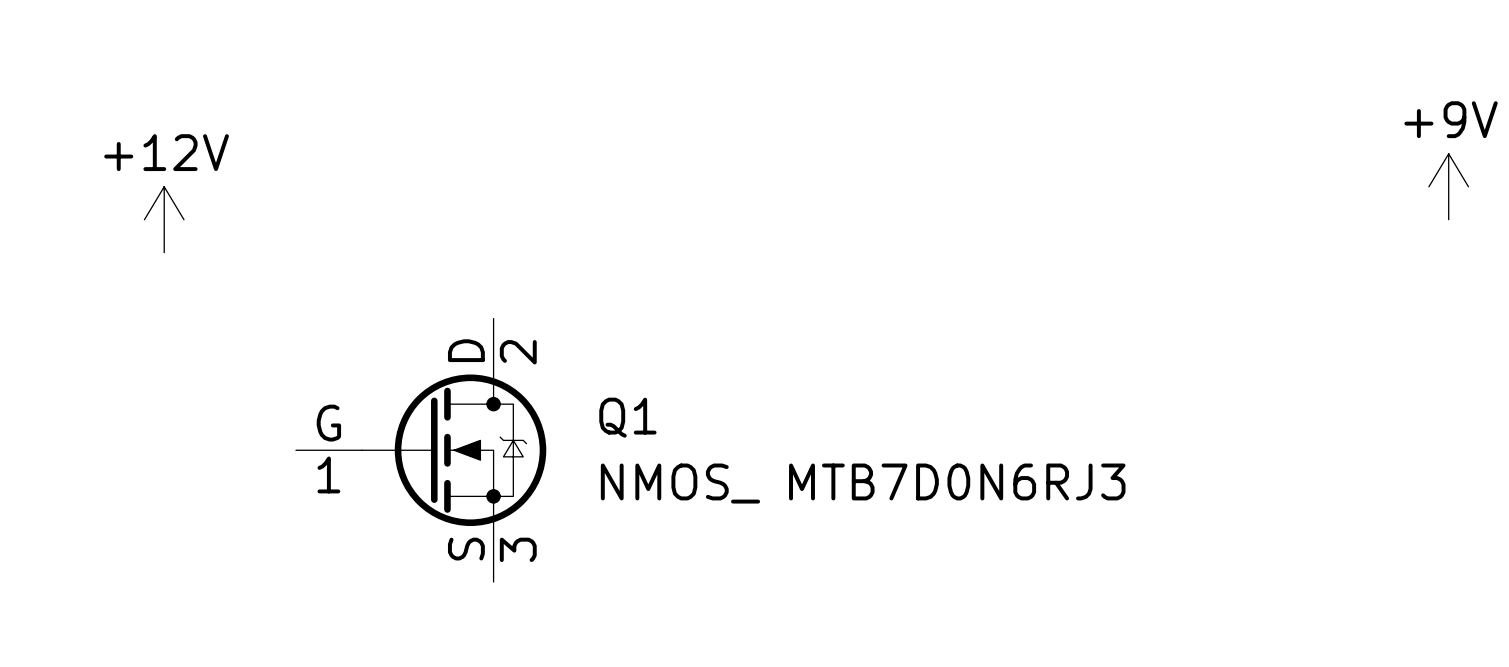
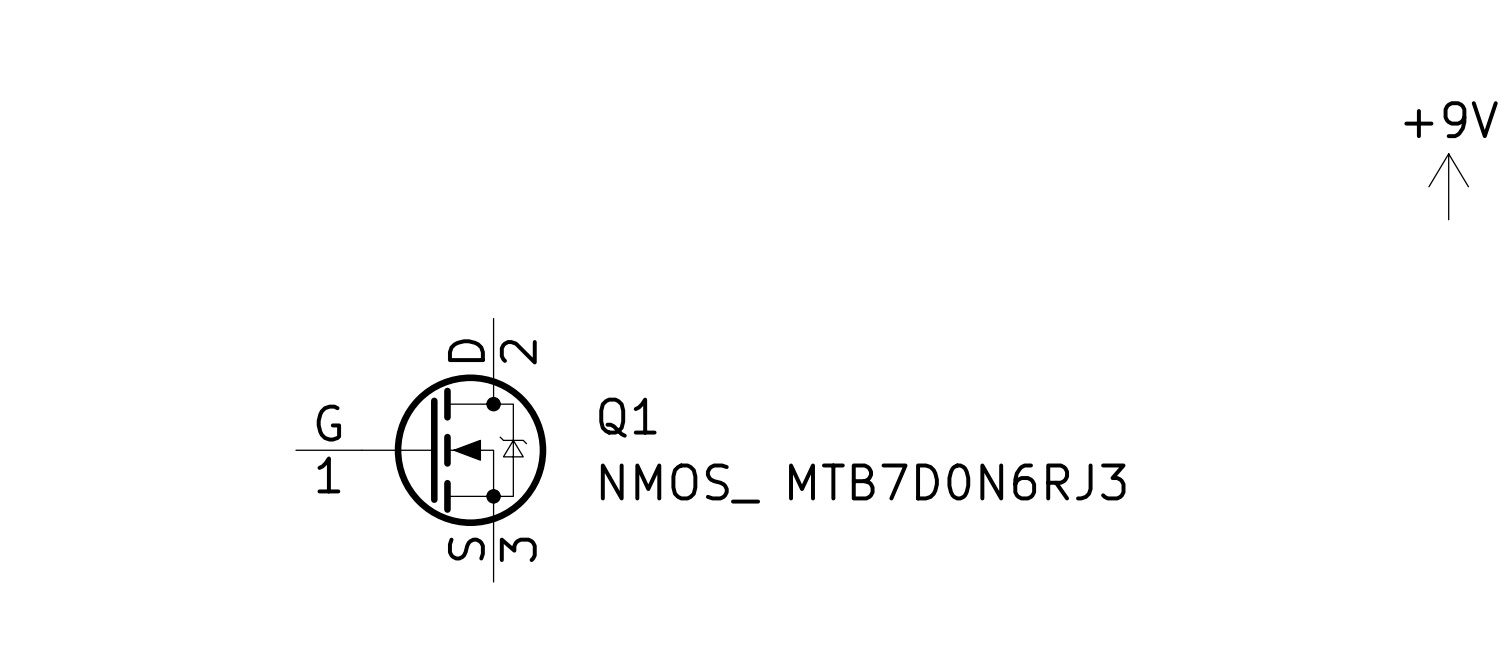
power symbol: +12V (164, 219) -> none

